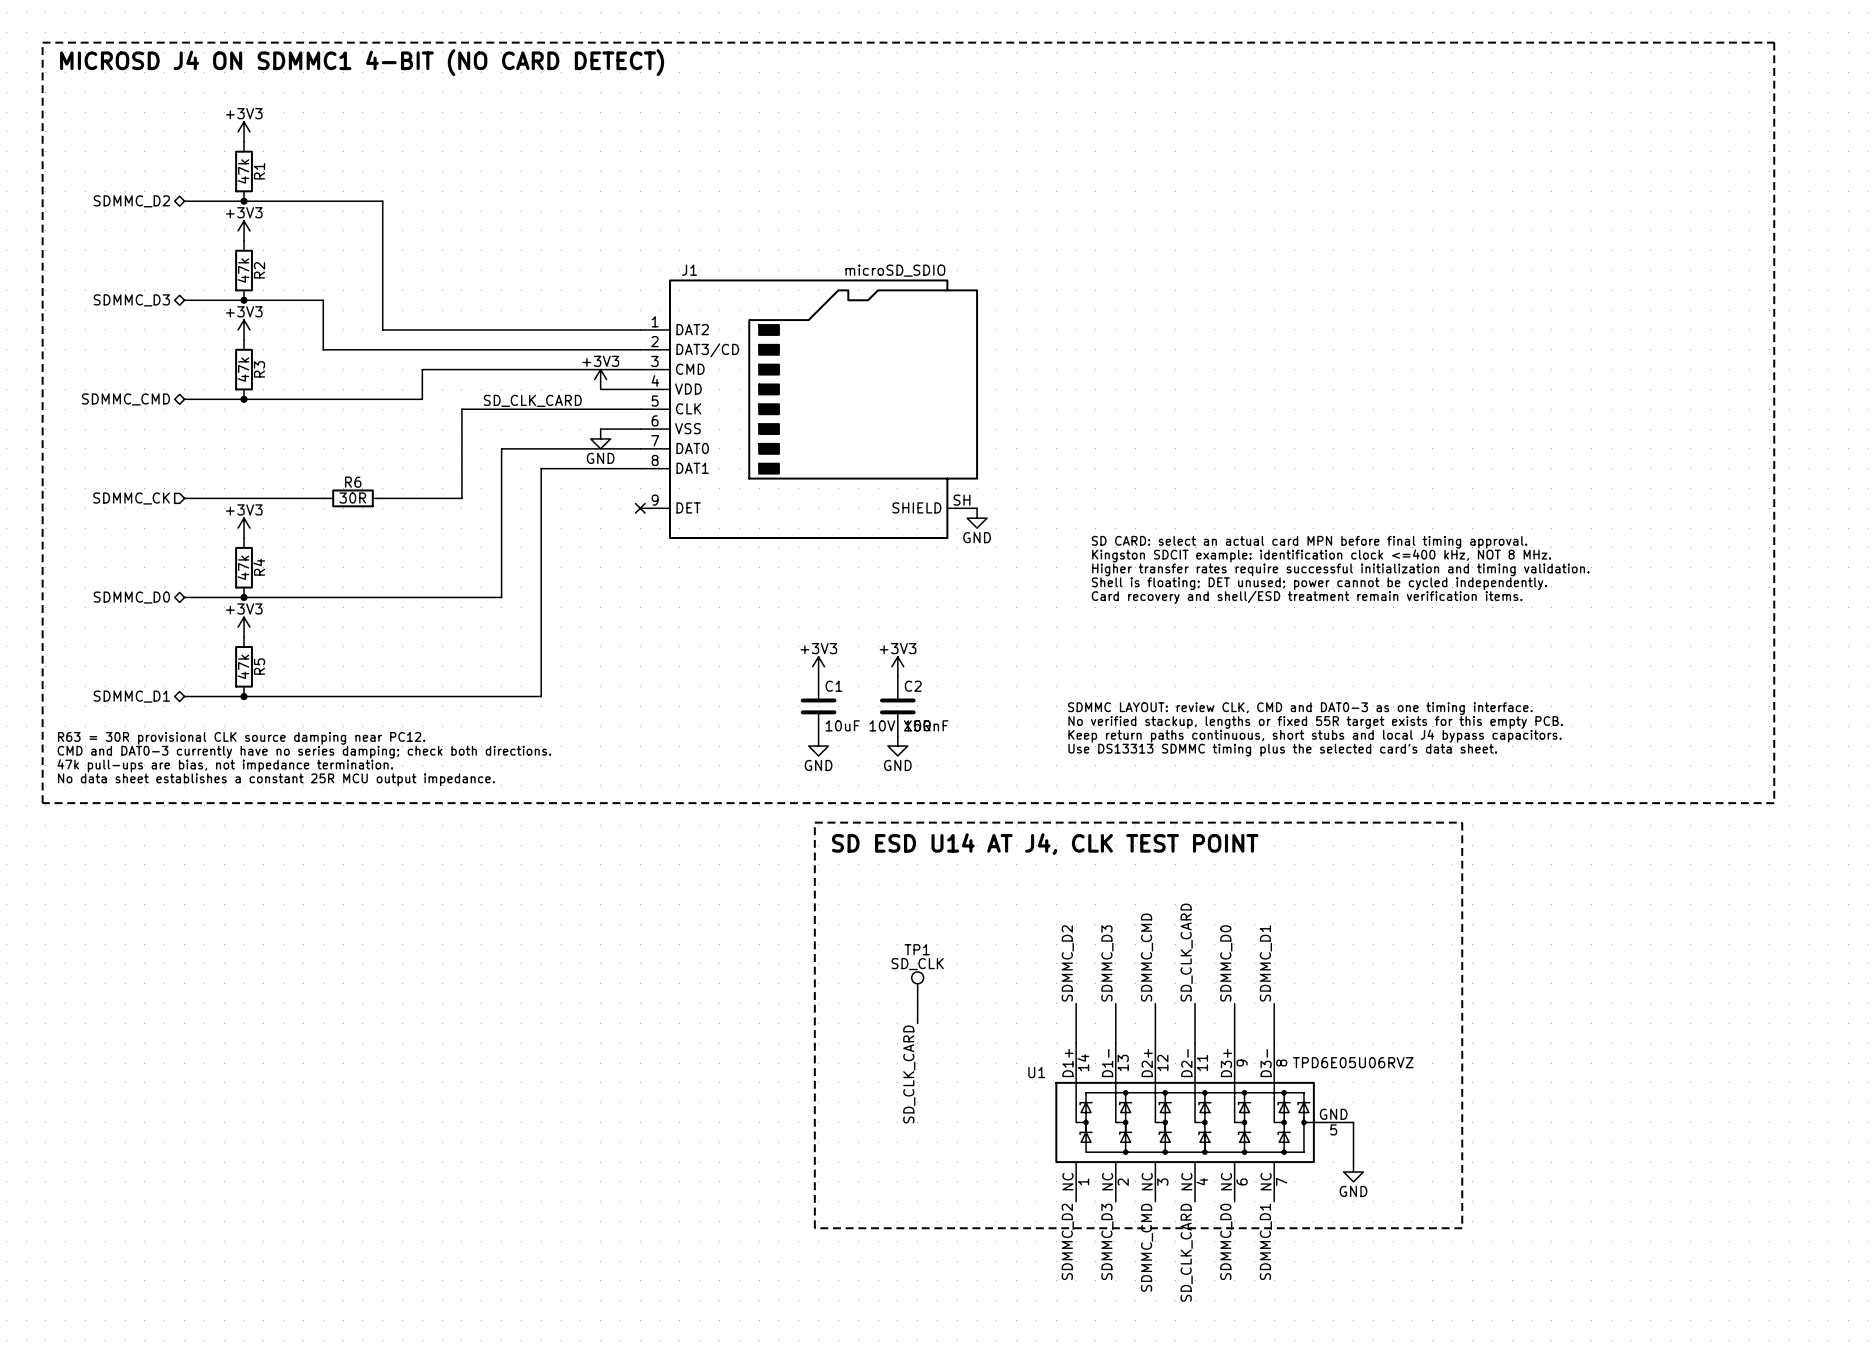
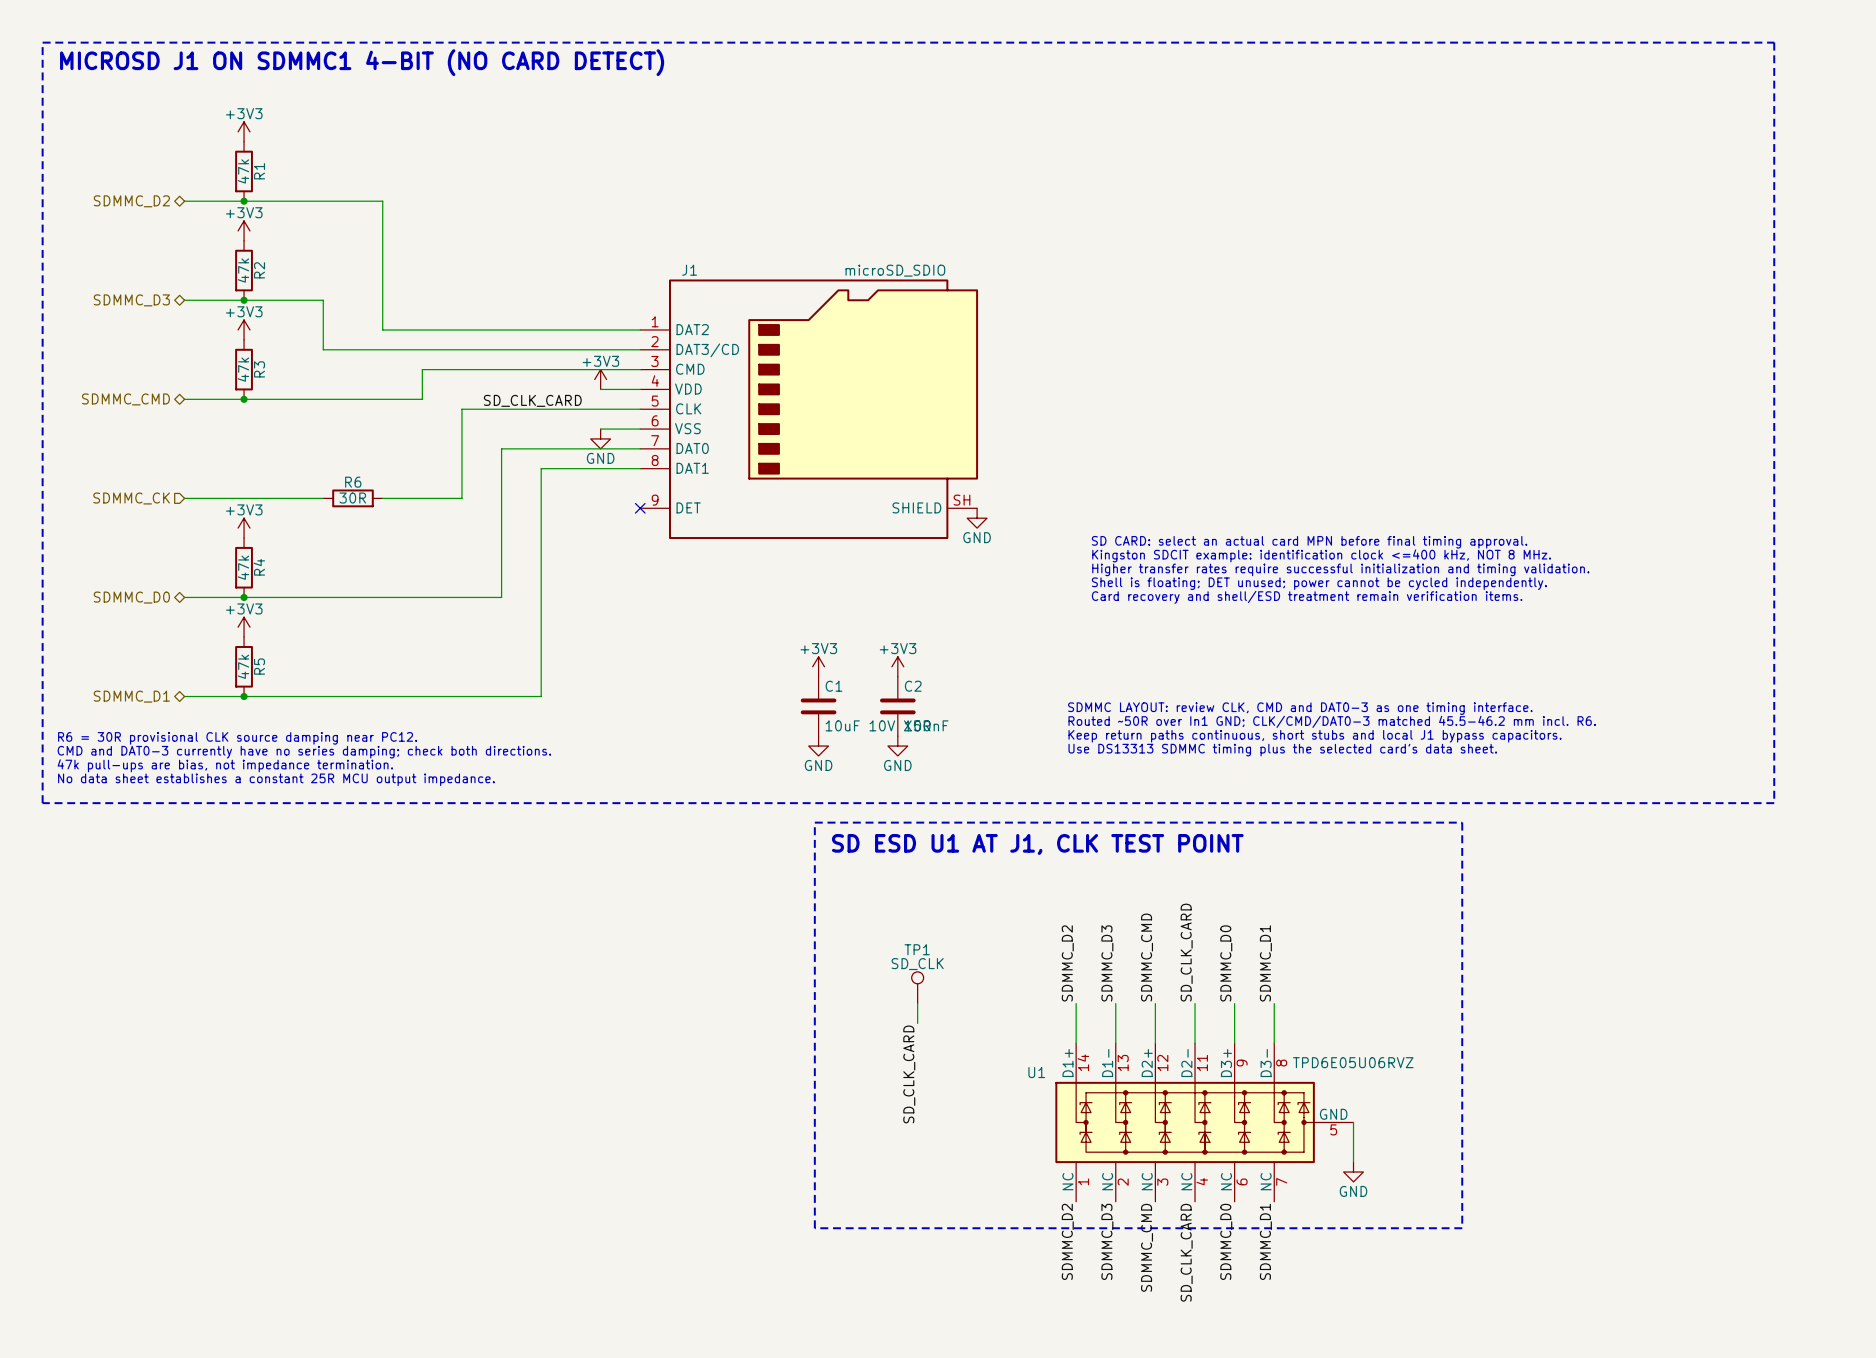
text: MICROSD J4 ON SDMMC1 4-BIT (NO CARD DETECT) (362, 62) -> MICROSD J1 ON SDMMC1 4-BIT (NO CARD DETECT) (362, 62)
text: No verified stackup, lengths or fixed 55R target exists for this empty PCB. (1315, 722) -> Routed ~50R over In1 GND; CLK/CMD/DAT0-3 matched 45.5-46.2 mm incl. R6. (1332, 721)
text: Keep return paths continuous, short stubs and local J4 bypass capacitors. (1315, 736) -> Keep return paths continuous, short stubs and local J1 bypass capacitors. (1315, 736)
text: R63 = 30R provisional CLK source damping near PC12. (241, 738) -> R6 = 30R provisional CLK source damping near PC12. (237, 738)
text: SD ESD U14 AT J4, CLK TEST POINT (1045, 844) -> SD ESD U1 AT J1, CLK TEST POINT (1037, 844)

